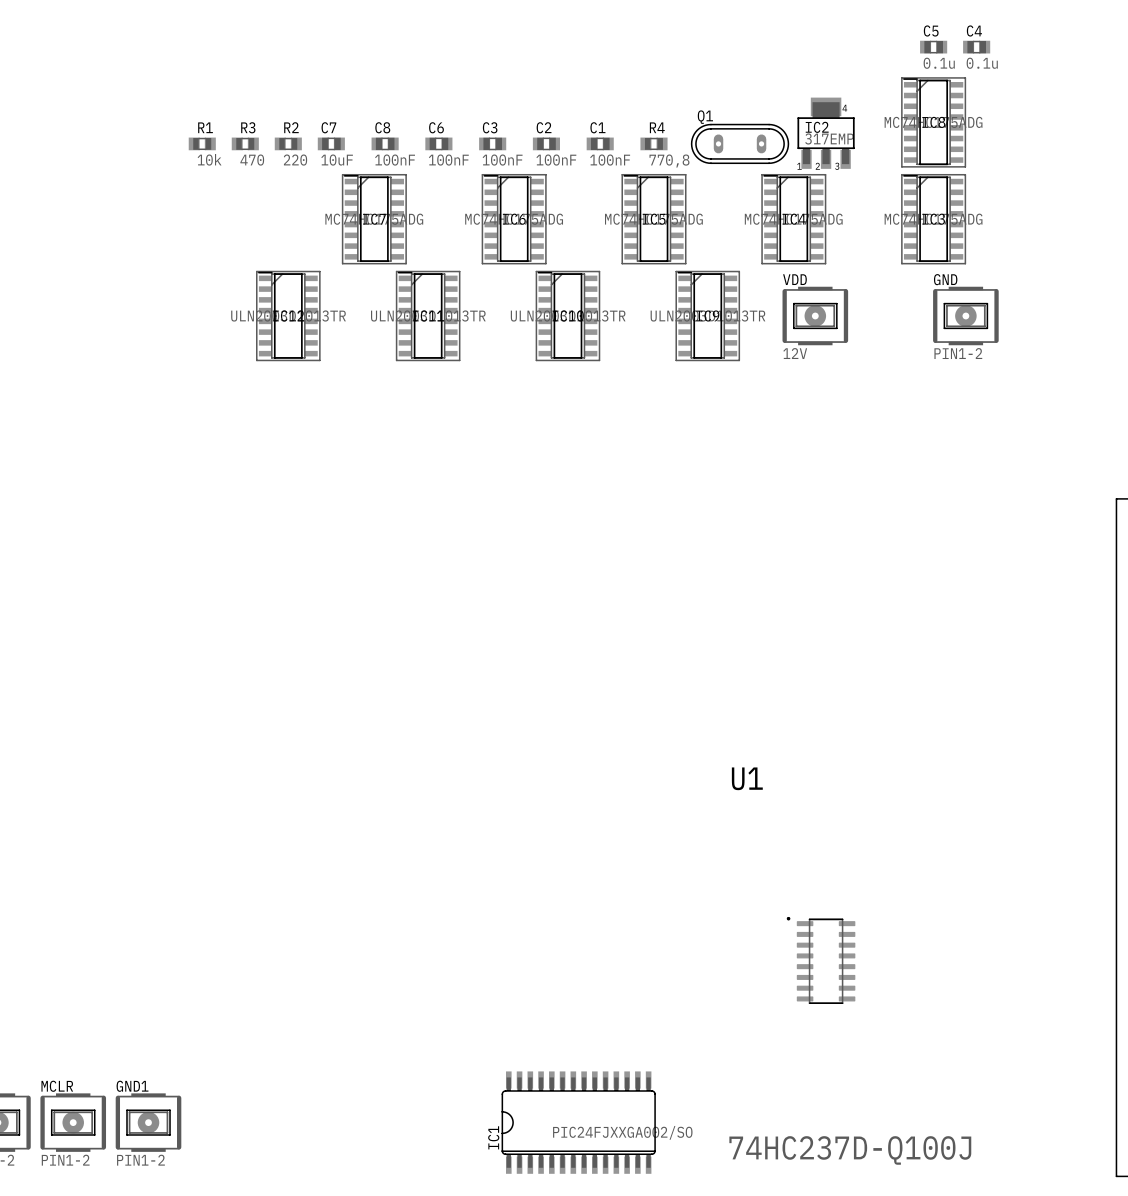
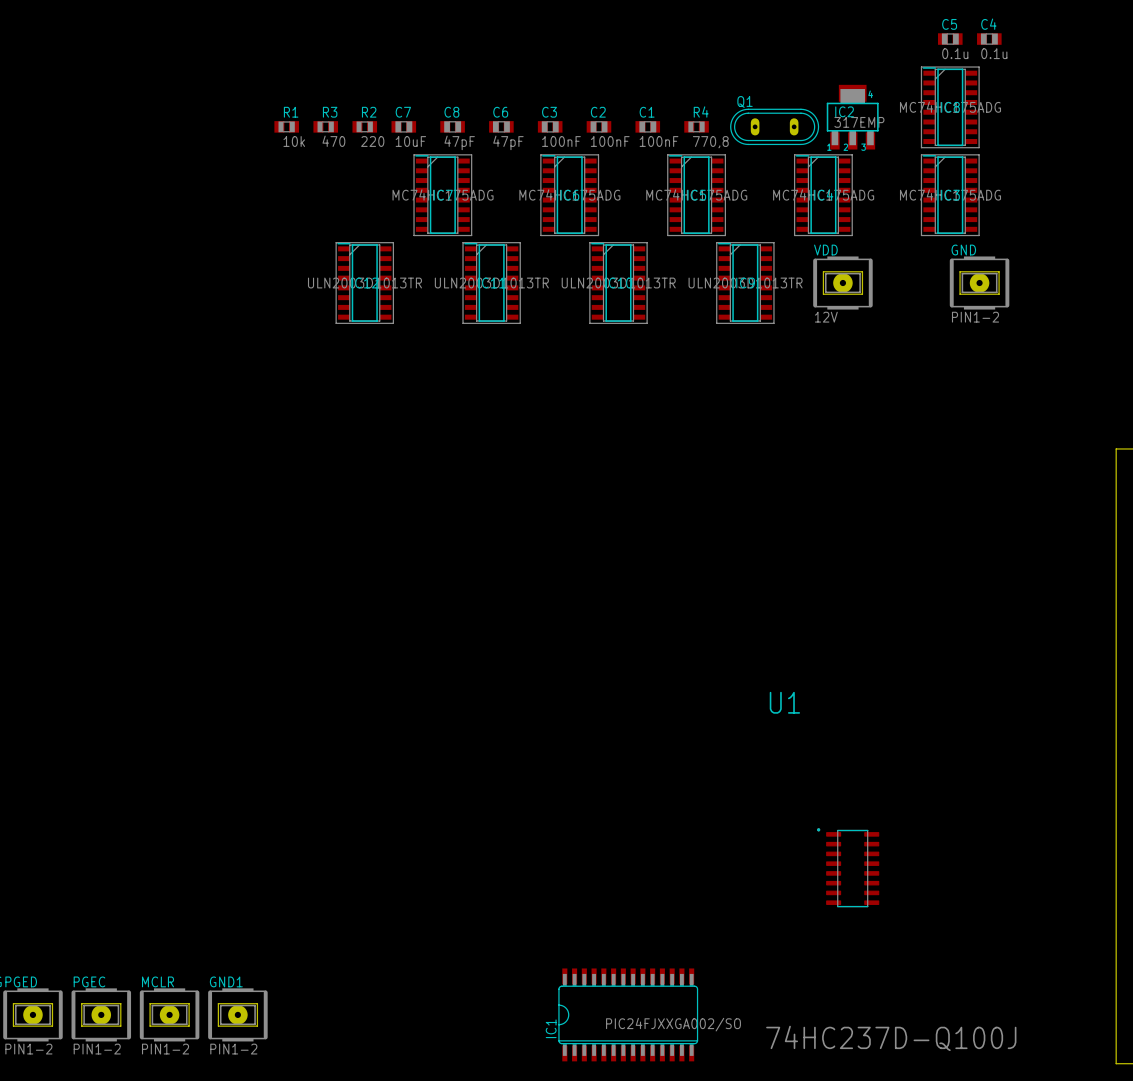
C8 value: 100nF (395, 160) -> 47pF (459, 142)
C6 value: 100nF (448, 160) -> 47pF (508, 142)

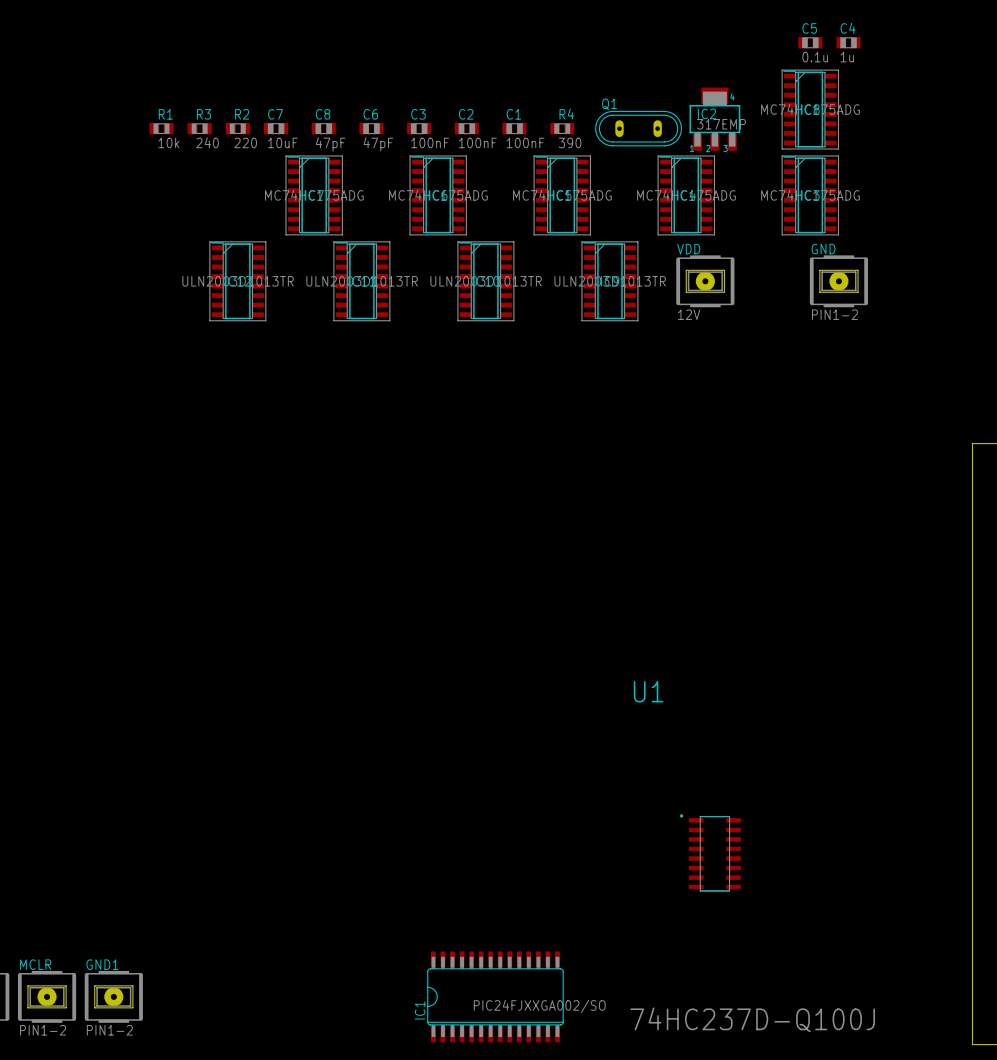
C4 value: 0.1u (994, 53) -> 1u (847, 57)
R3 value: 470 (333, 141) -> 240 (207, 142)
R4 value: 770,8 (710, 142) -> 390 (570, 142)

